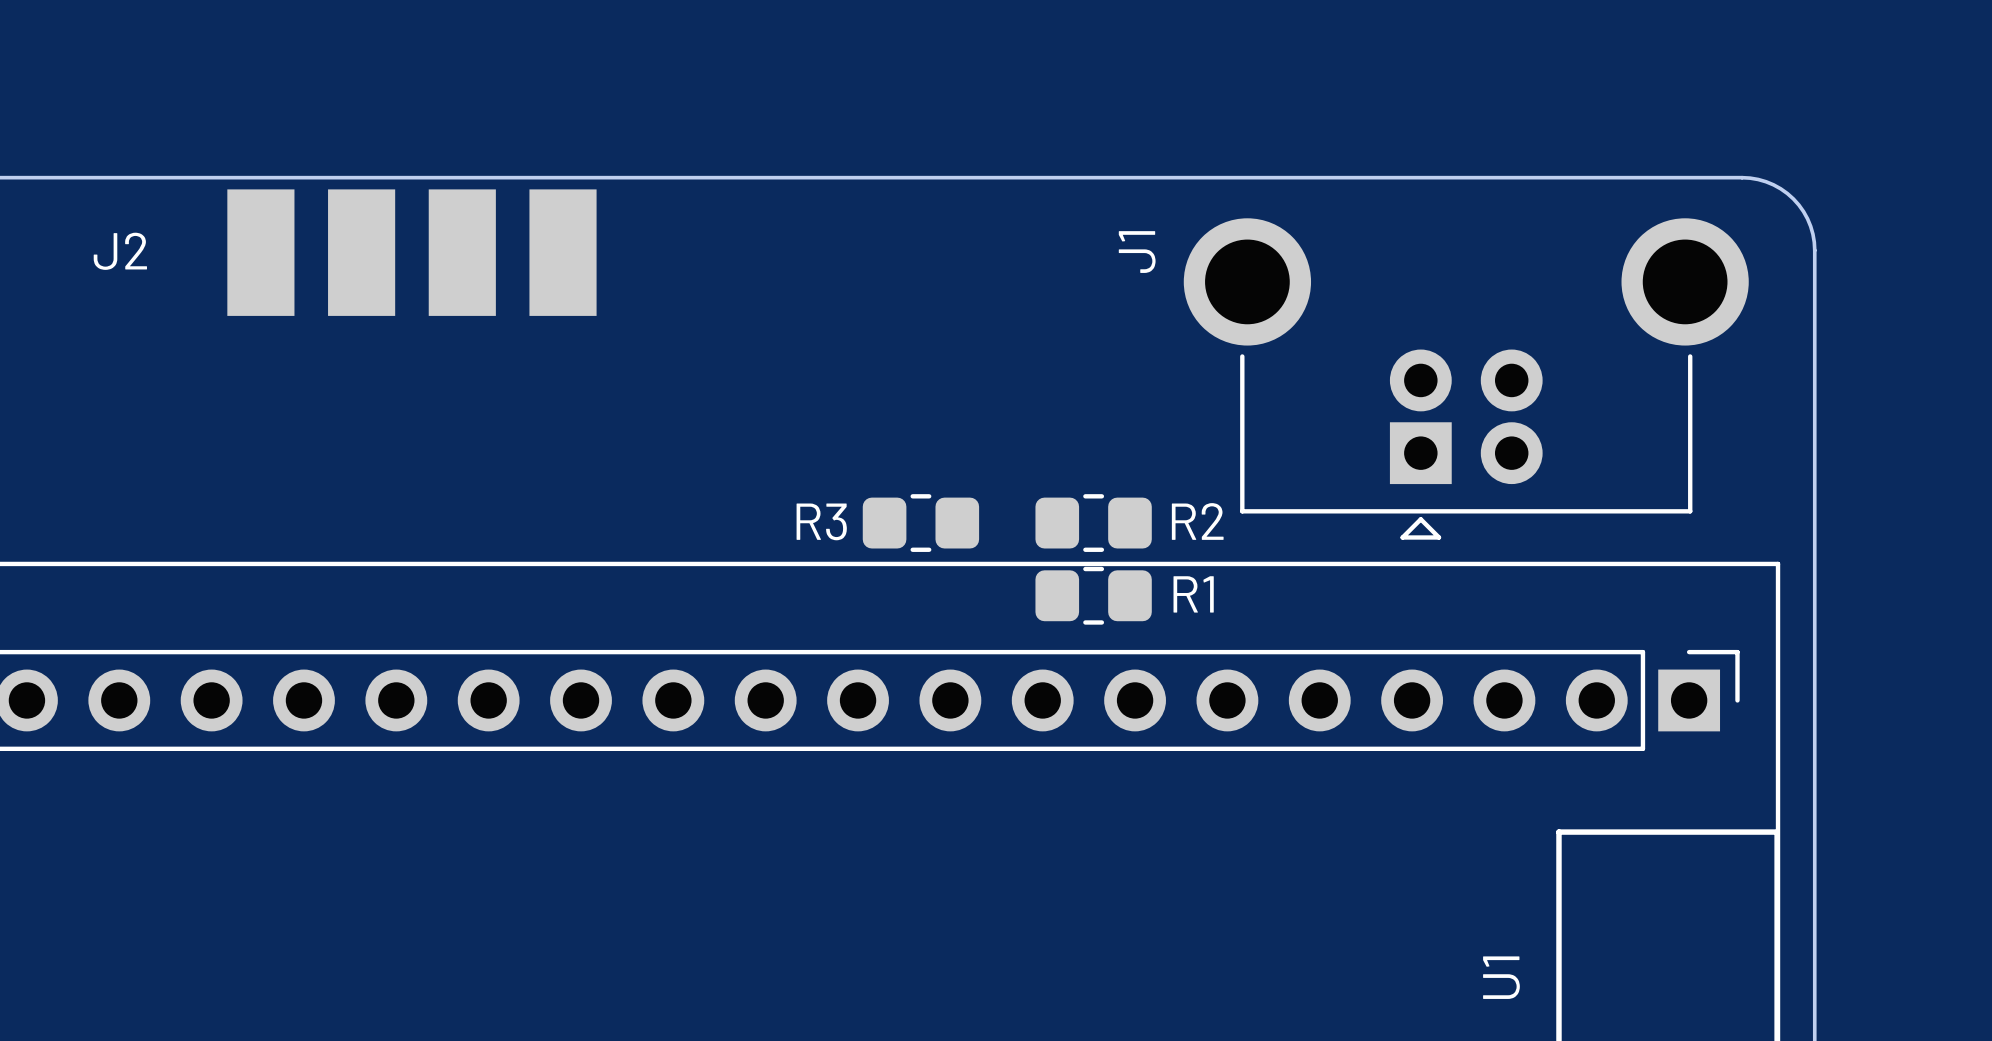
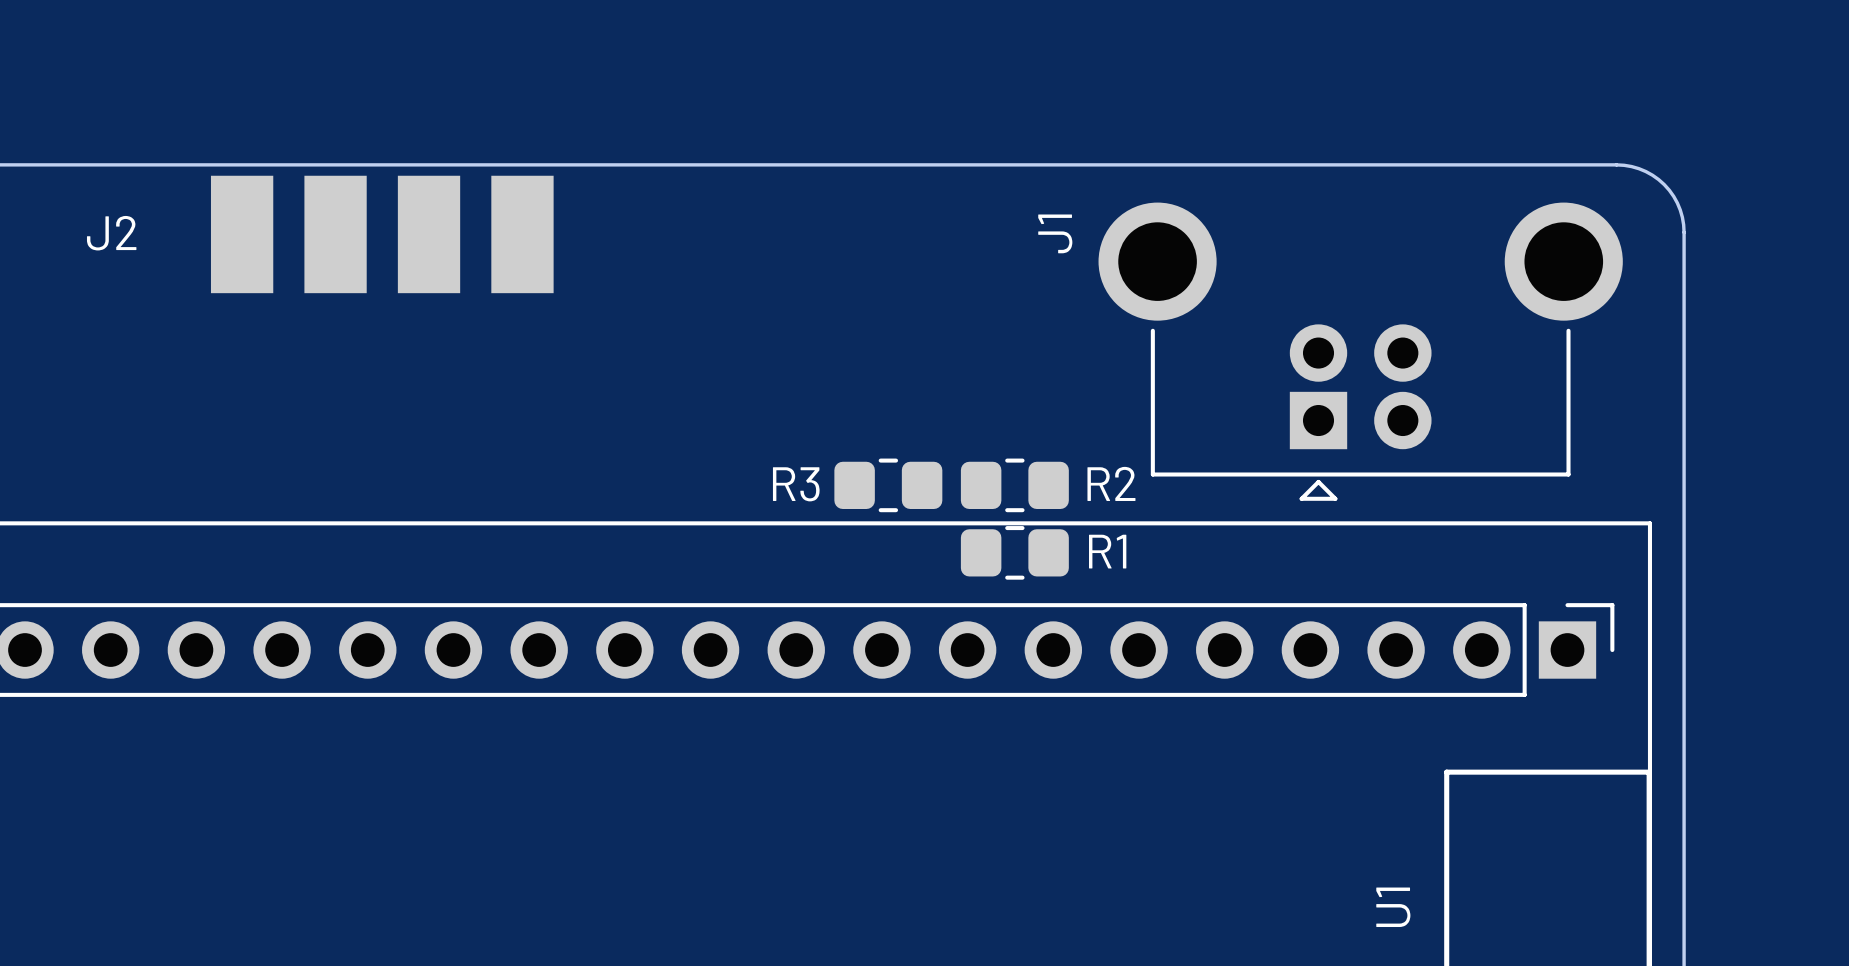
R3 position: (920, 523) -> (888, 485)

